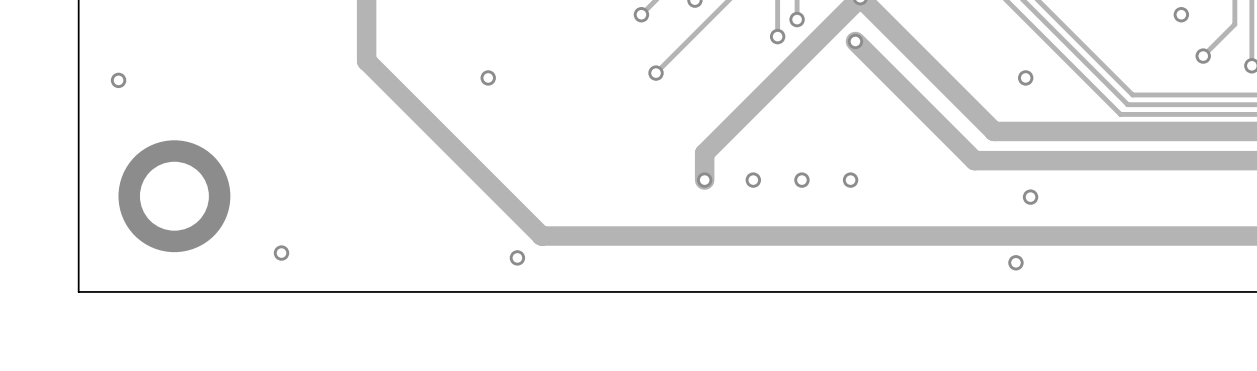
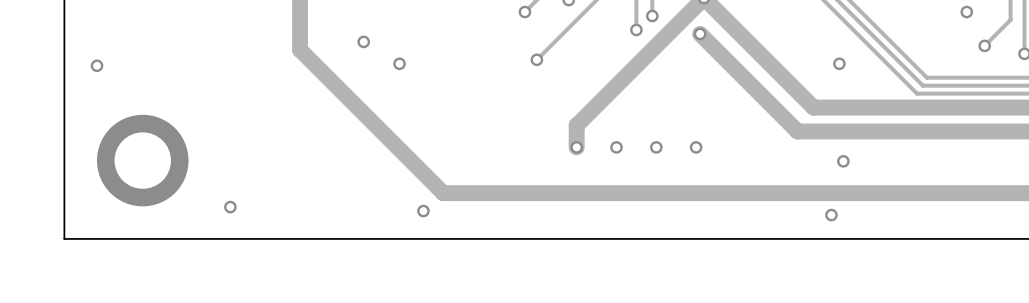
via: none -> (363, 41)

